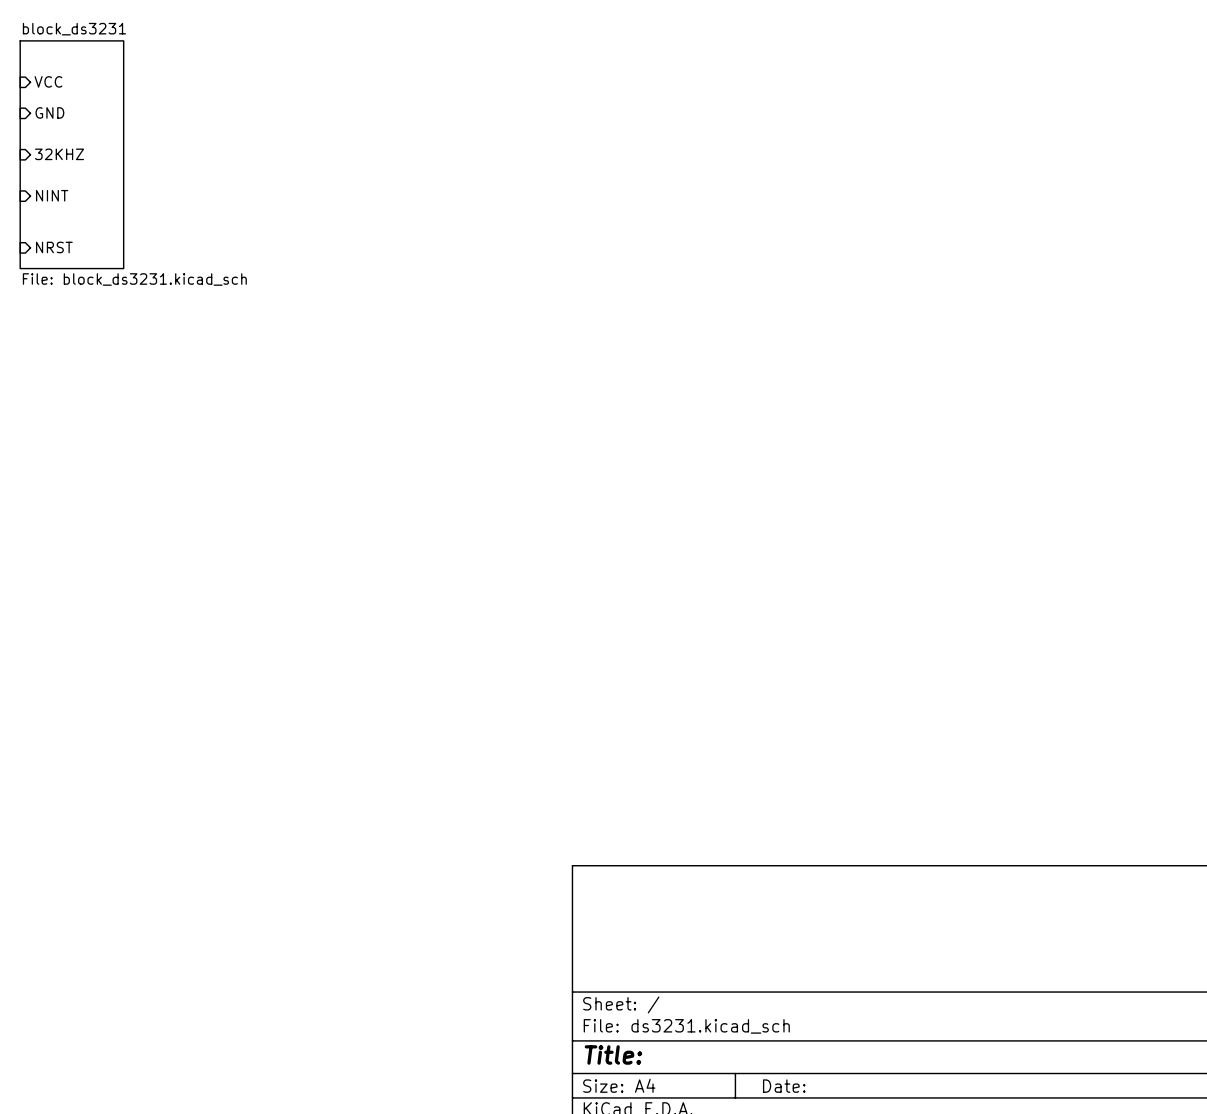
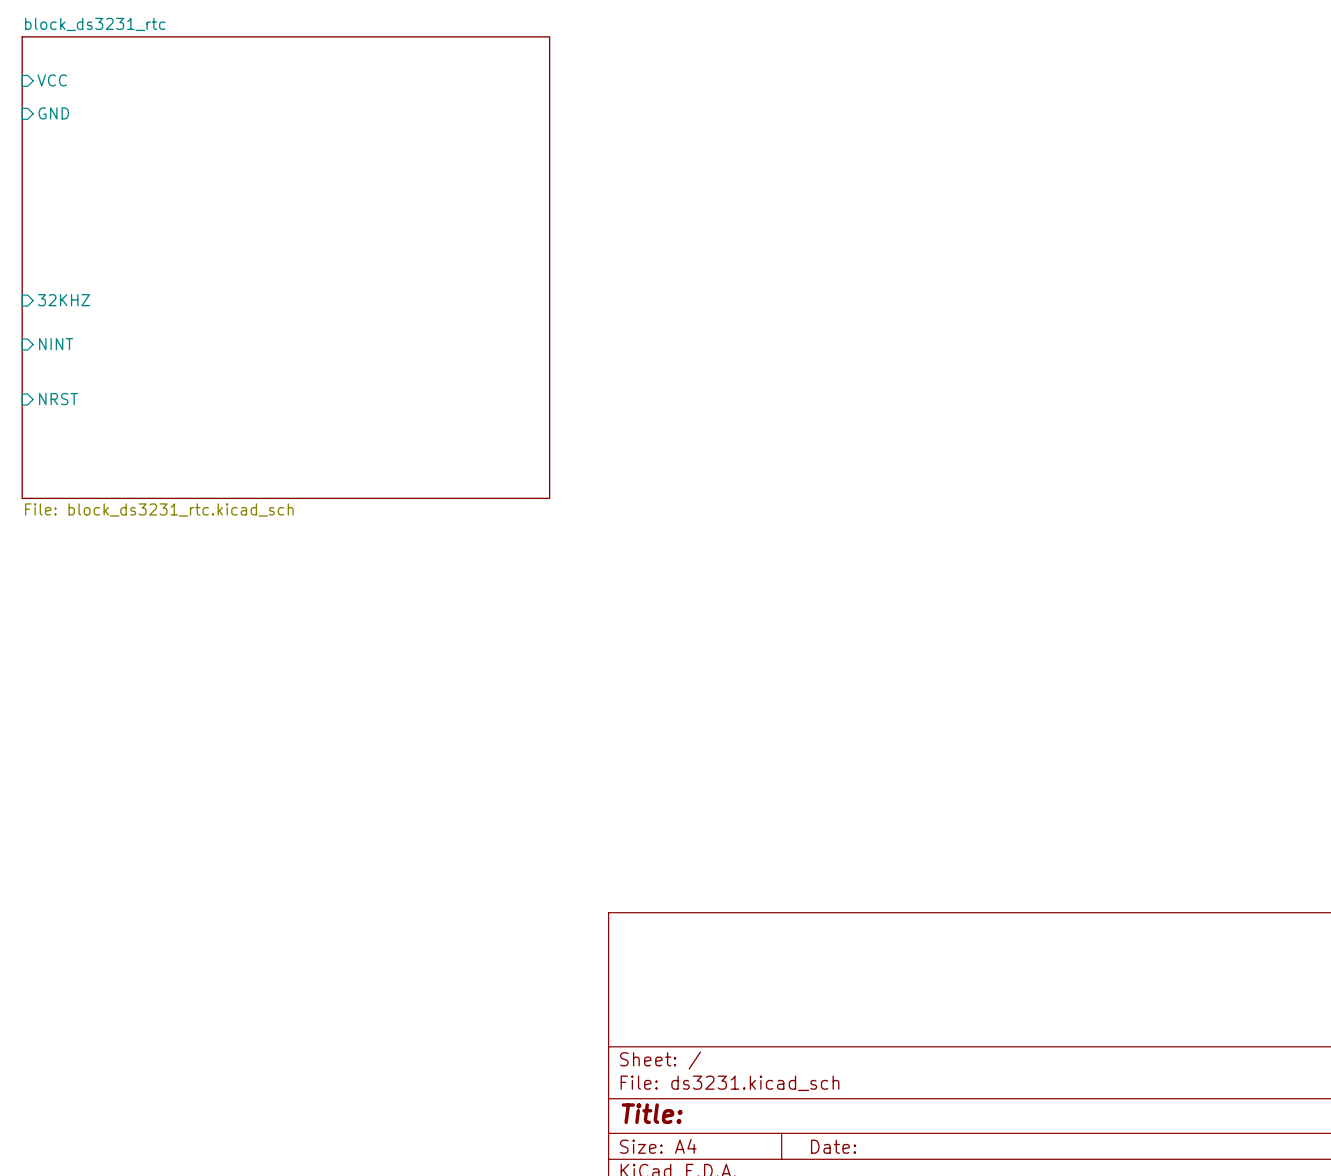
sheet pin position: 32KHZ (59, 154) -> 32KHZ (63, 300)
sheet block_ds3231: File: block_ds3231.kicad_sch (71, 154) -> none
sheet pin position: NINT (52, 195) -> NINT (56, 344)
sheet pin position: NRST (54, 247) -> NRST (58, 399)
sheet block_ds3231_rtc: none -> File: block_ds3231_rtc.kicad_sch (285, 267)

